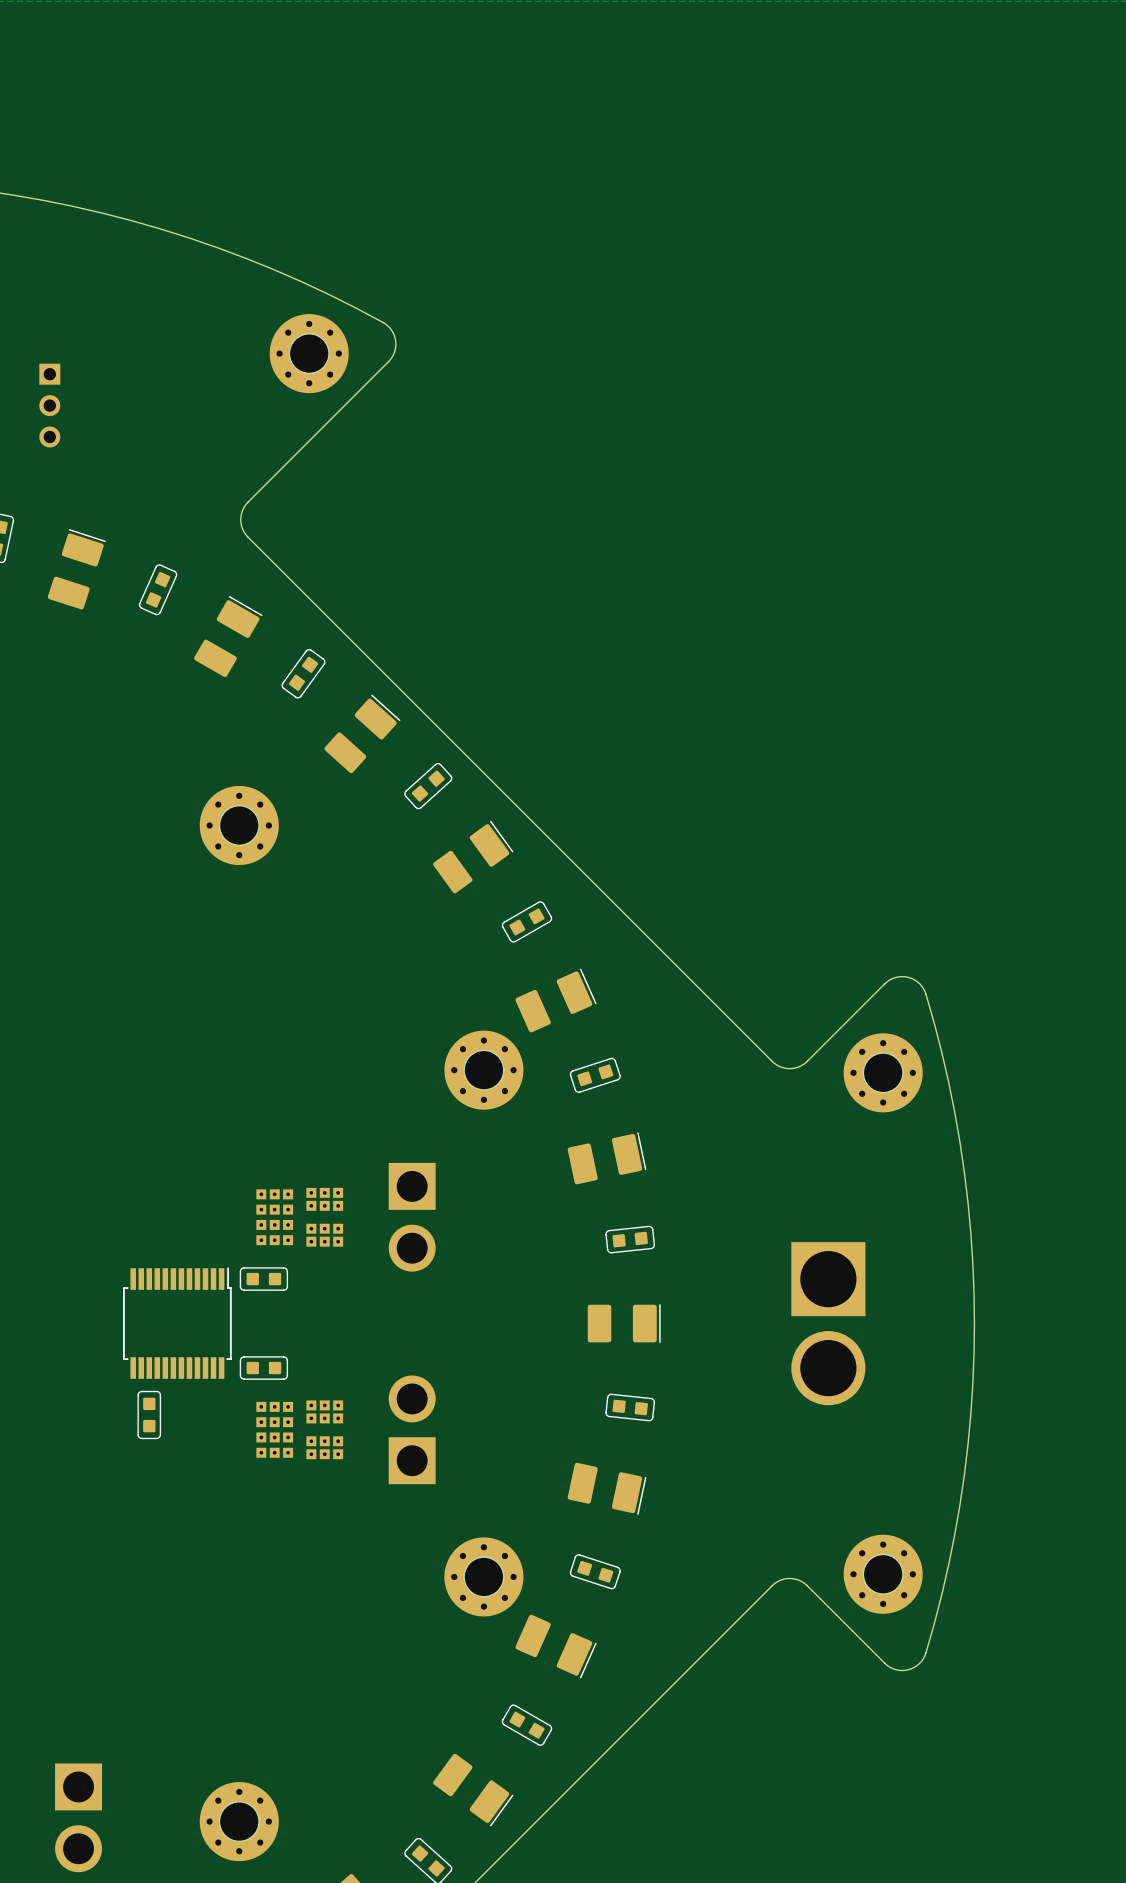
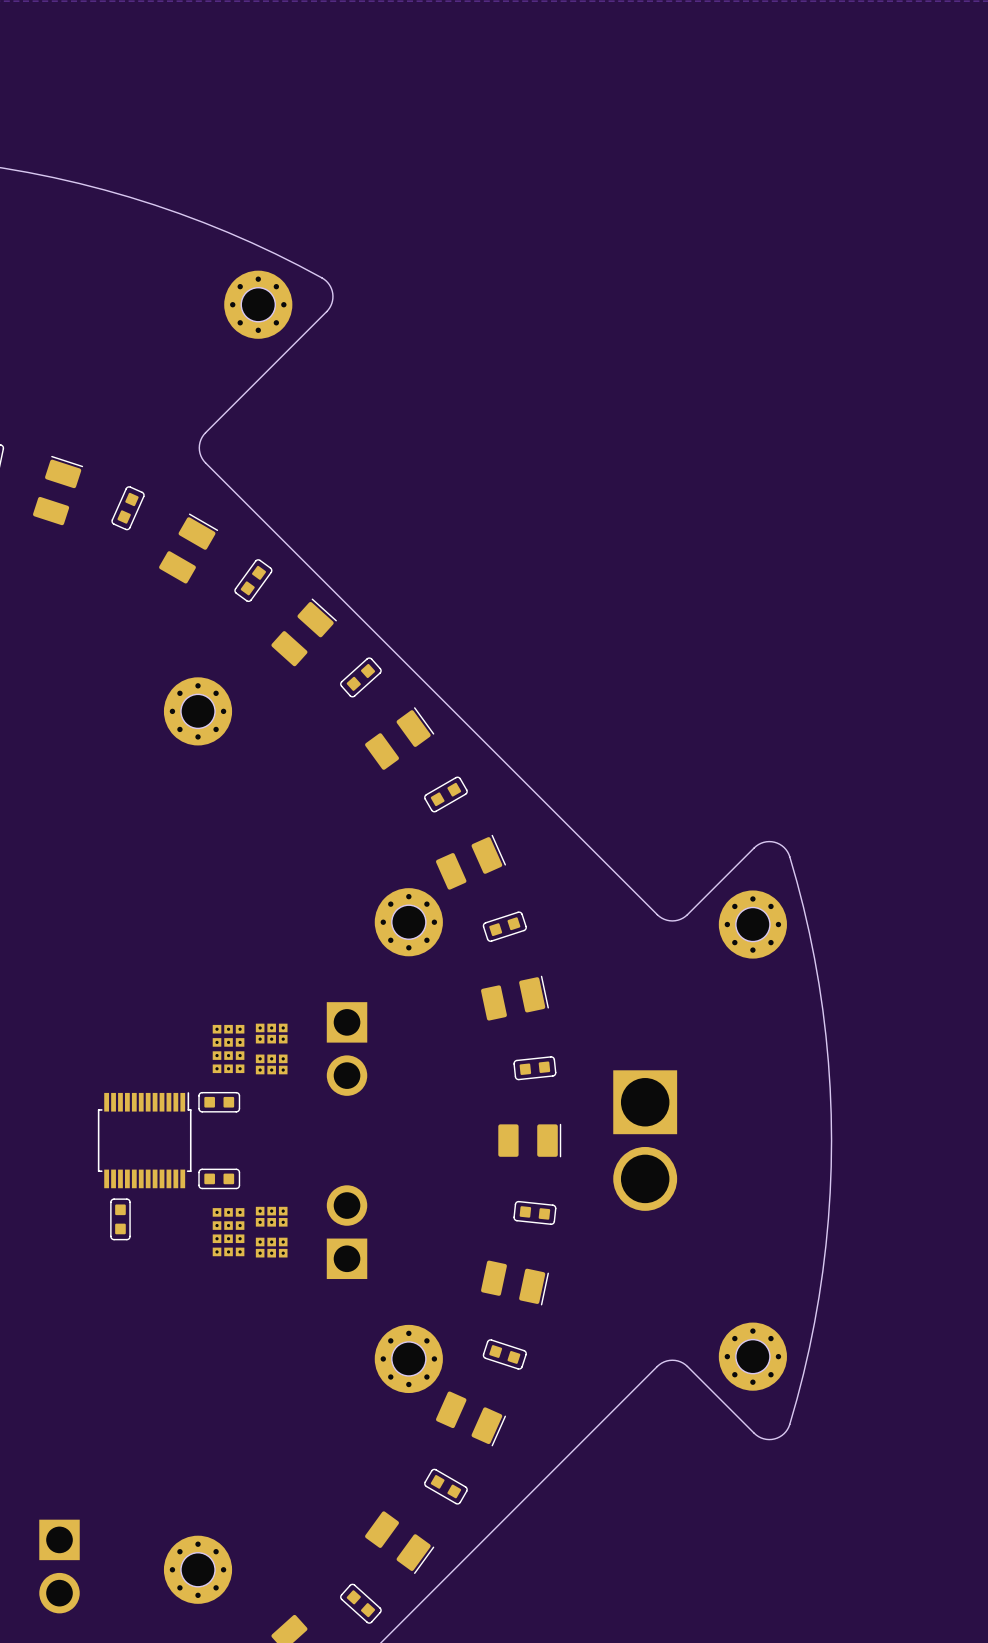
part: (49, 405) -> none
part position: (828, 1323) -> (645, 1140)

